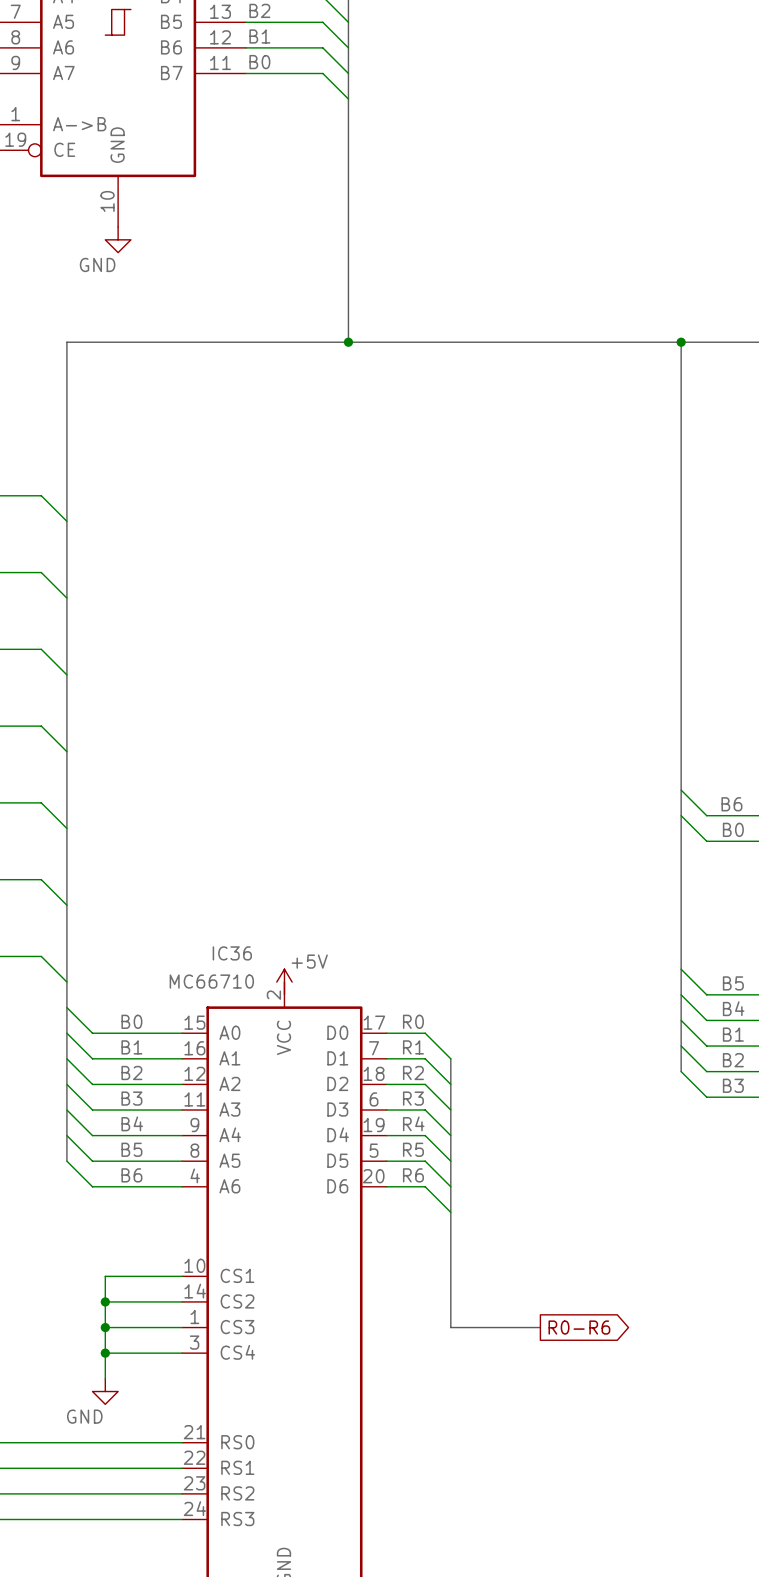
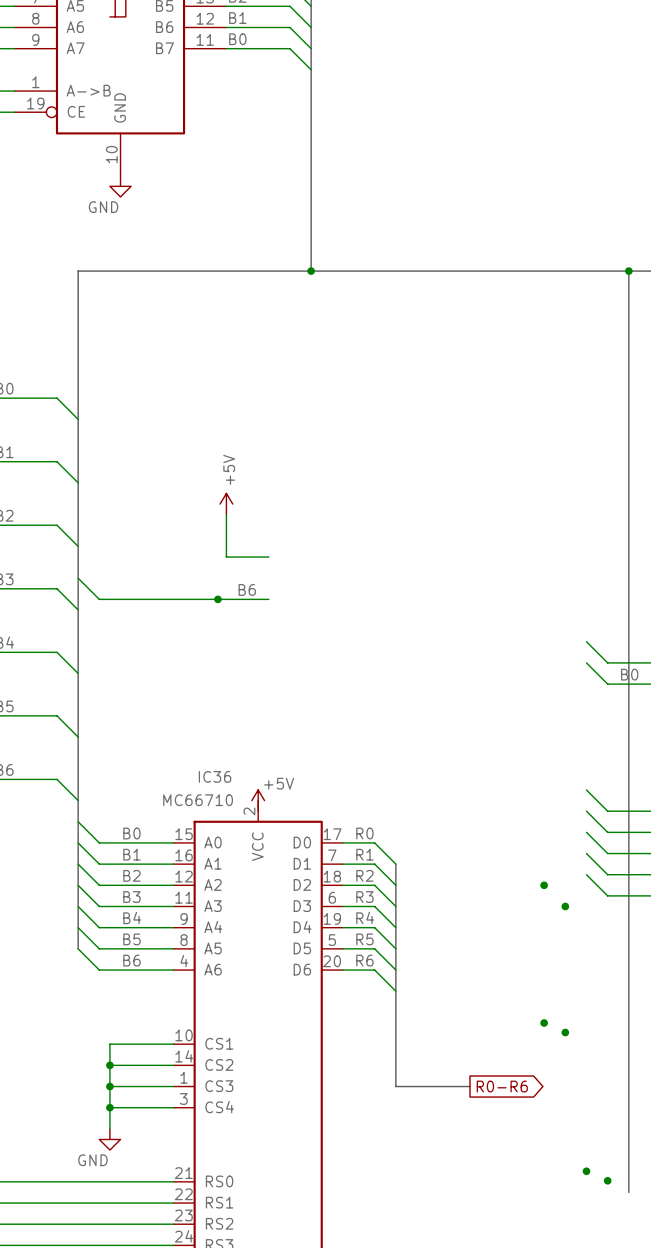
bus: (681, 342) (681, 1071) -> none
junction position: (681, 342) -> (628, 271)
bus: none -> (628, 271) (628, 1192)
power symbol: none -> +5V (226, 504)
wire: none -> (226, 514) (226, 557) (268, 557)
wire: none -> (78, 578) (99, 599) (268, 599)
label: none -> B6 (247, 589)
junction: none -> (217, 599)
label: B6 (731, 804) -> none
label: B5 (733, 983) -> none
label: B4 (733, 1008) -> none
label: B1 (733, 1034) -> none
label: B2 (733, 1060) -> none
junction: none -> (544, 885)
label: B3 (733, 1085) -> none
junction: none -> (565, 906)
junction: none -> (544, 1022)
junction: none -> (565, 1032)
junction: none -> (586, 1171)
junction: none -> (607, 1180)

